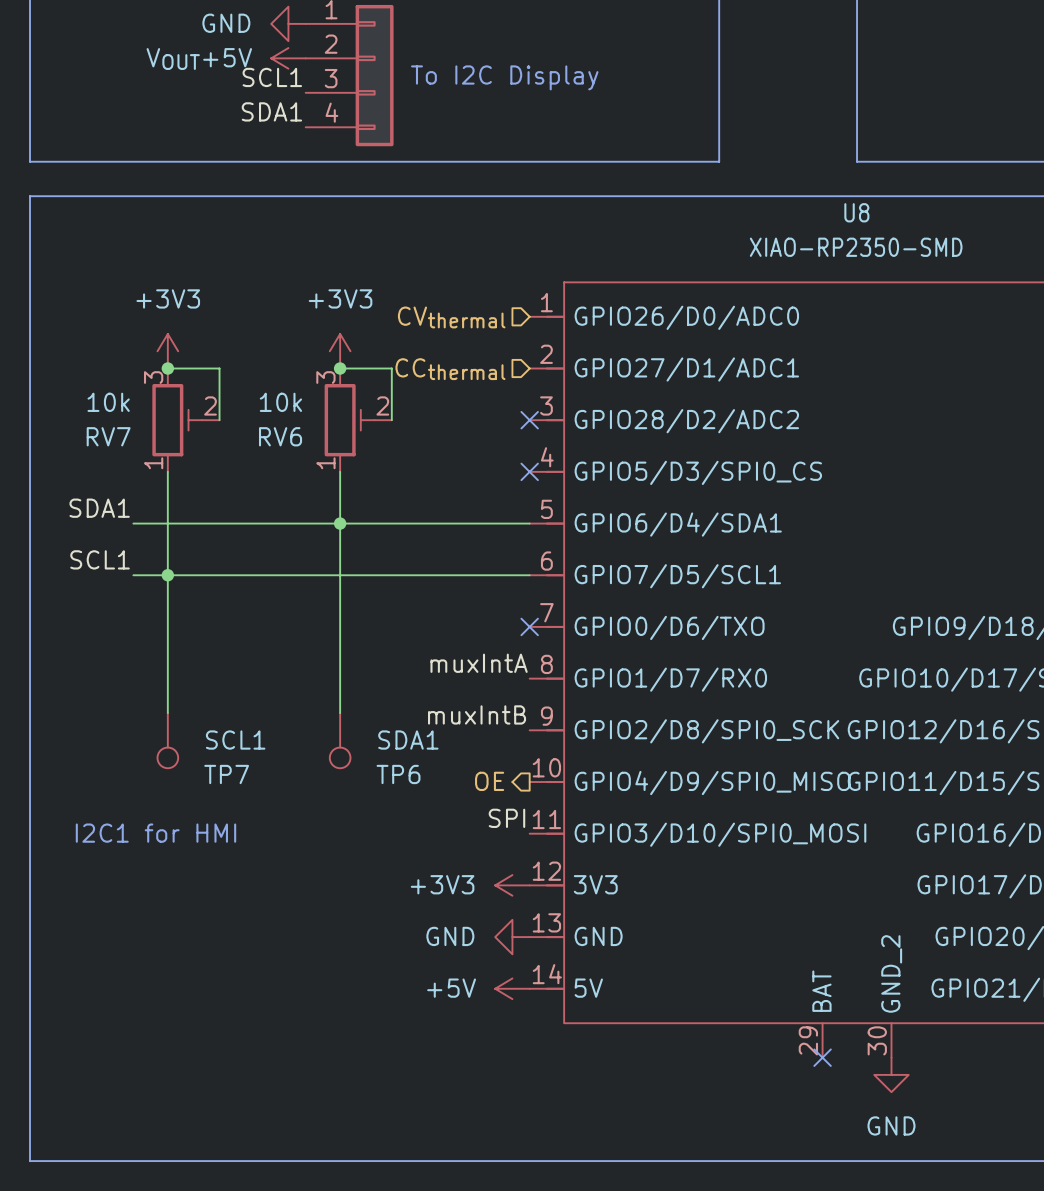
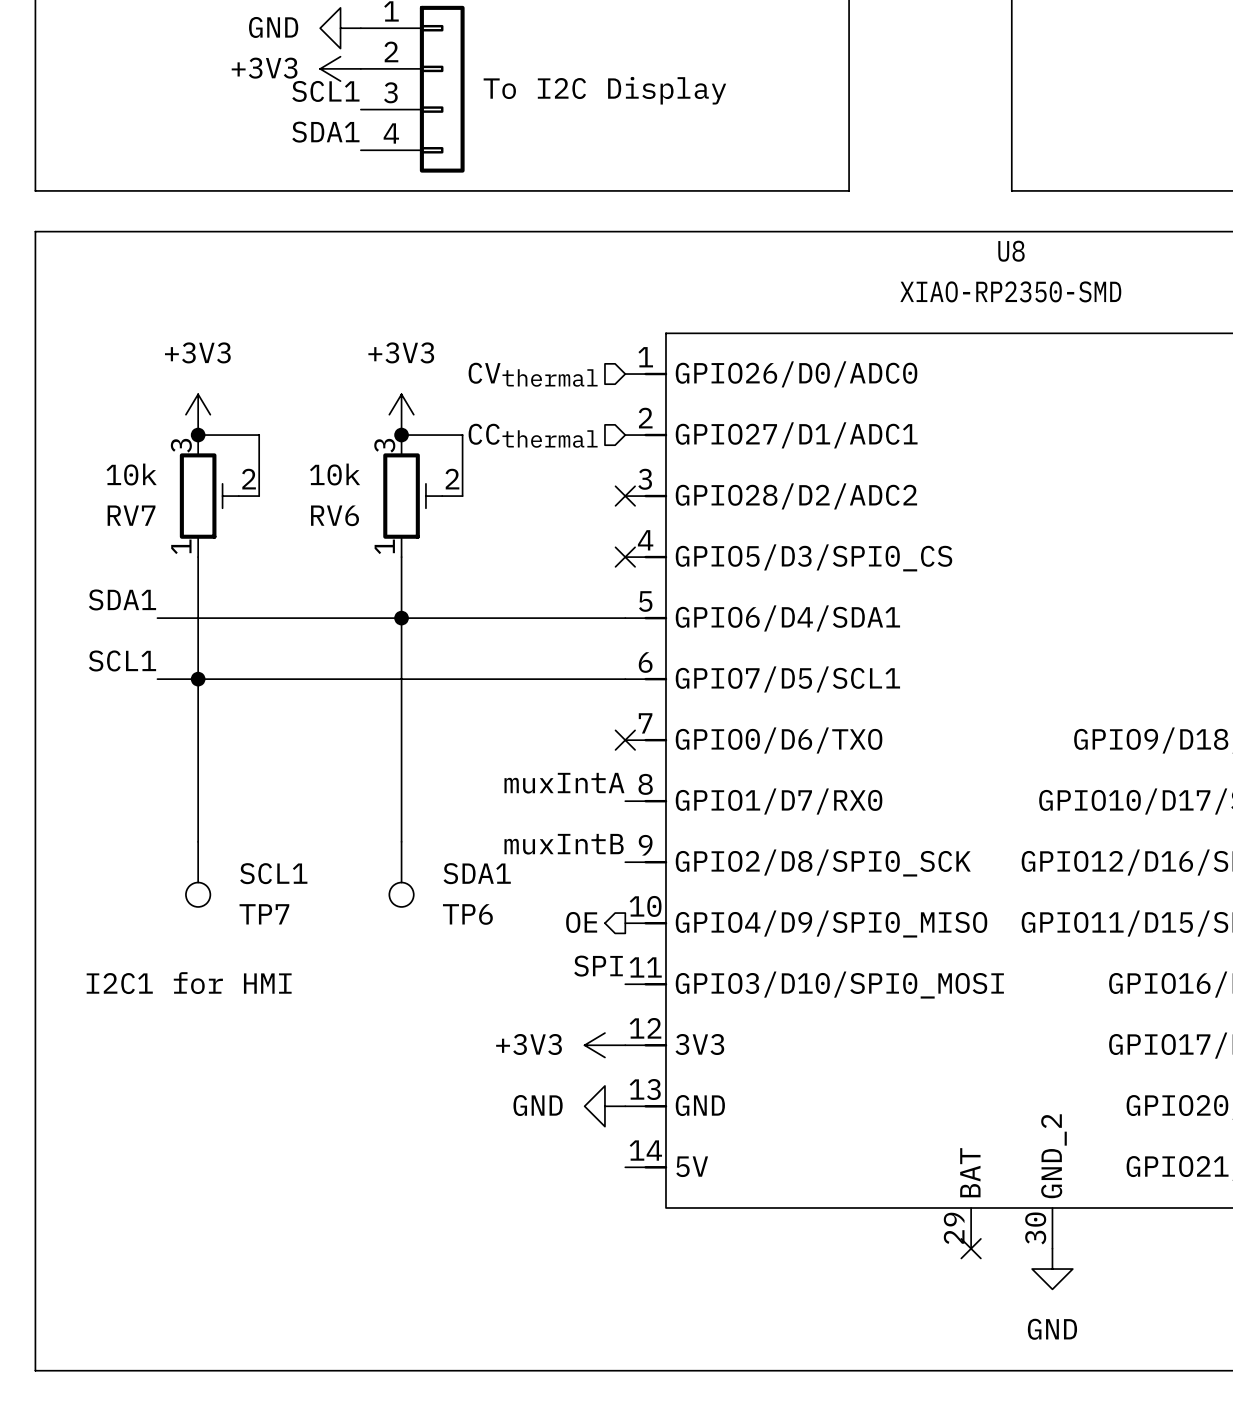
power symbol: VOUT+5V (288, 58) -> +3V3 (340, 68)
power symbol: +5V (512, 988) -> none

